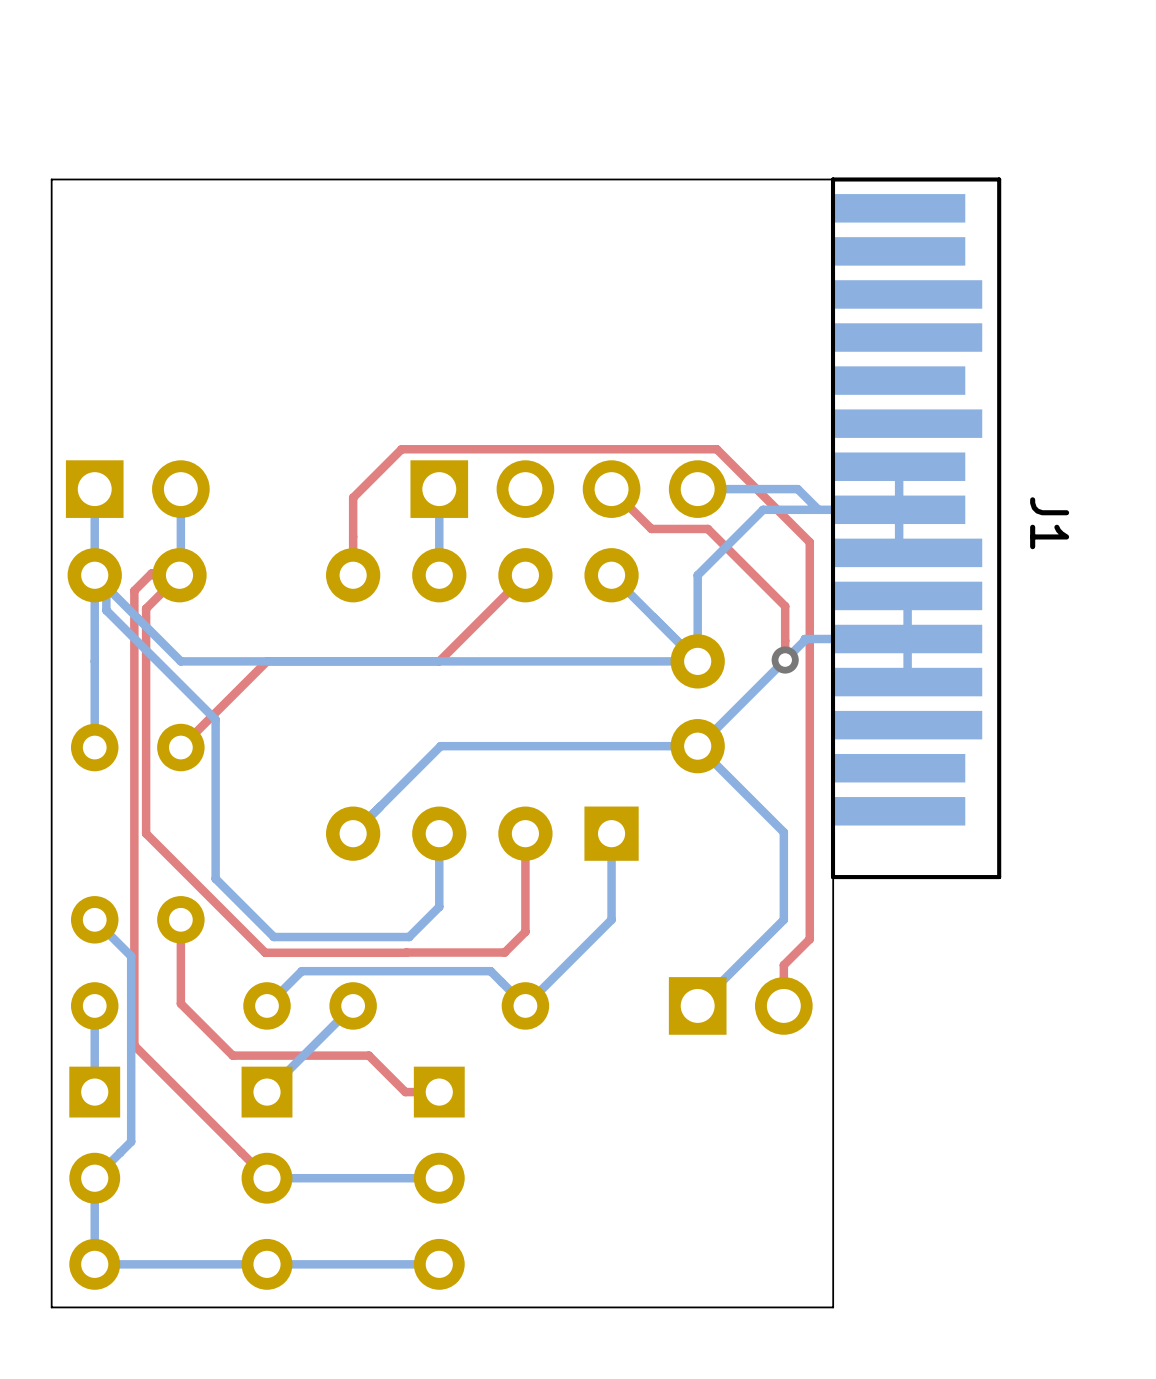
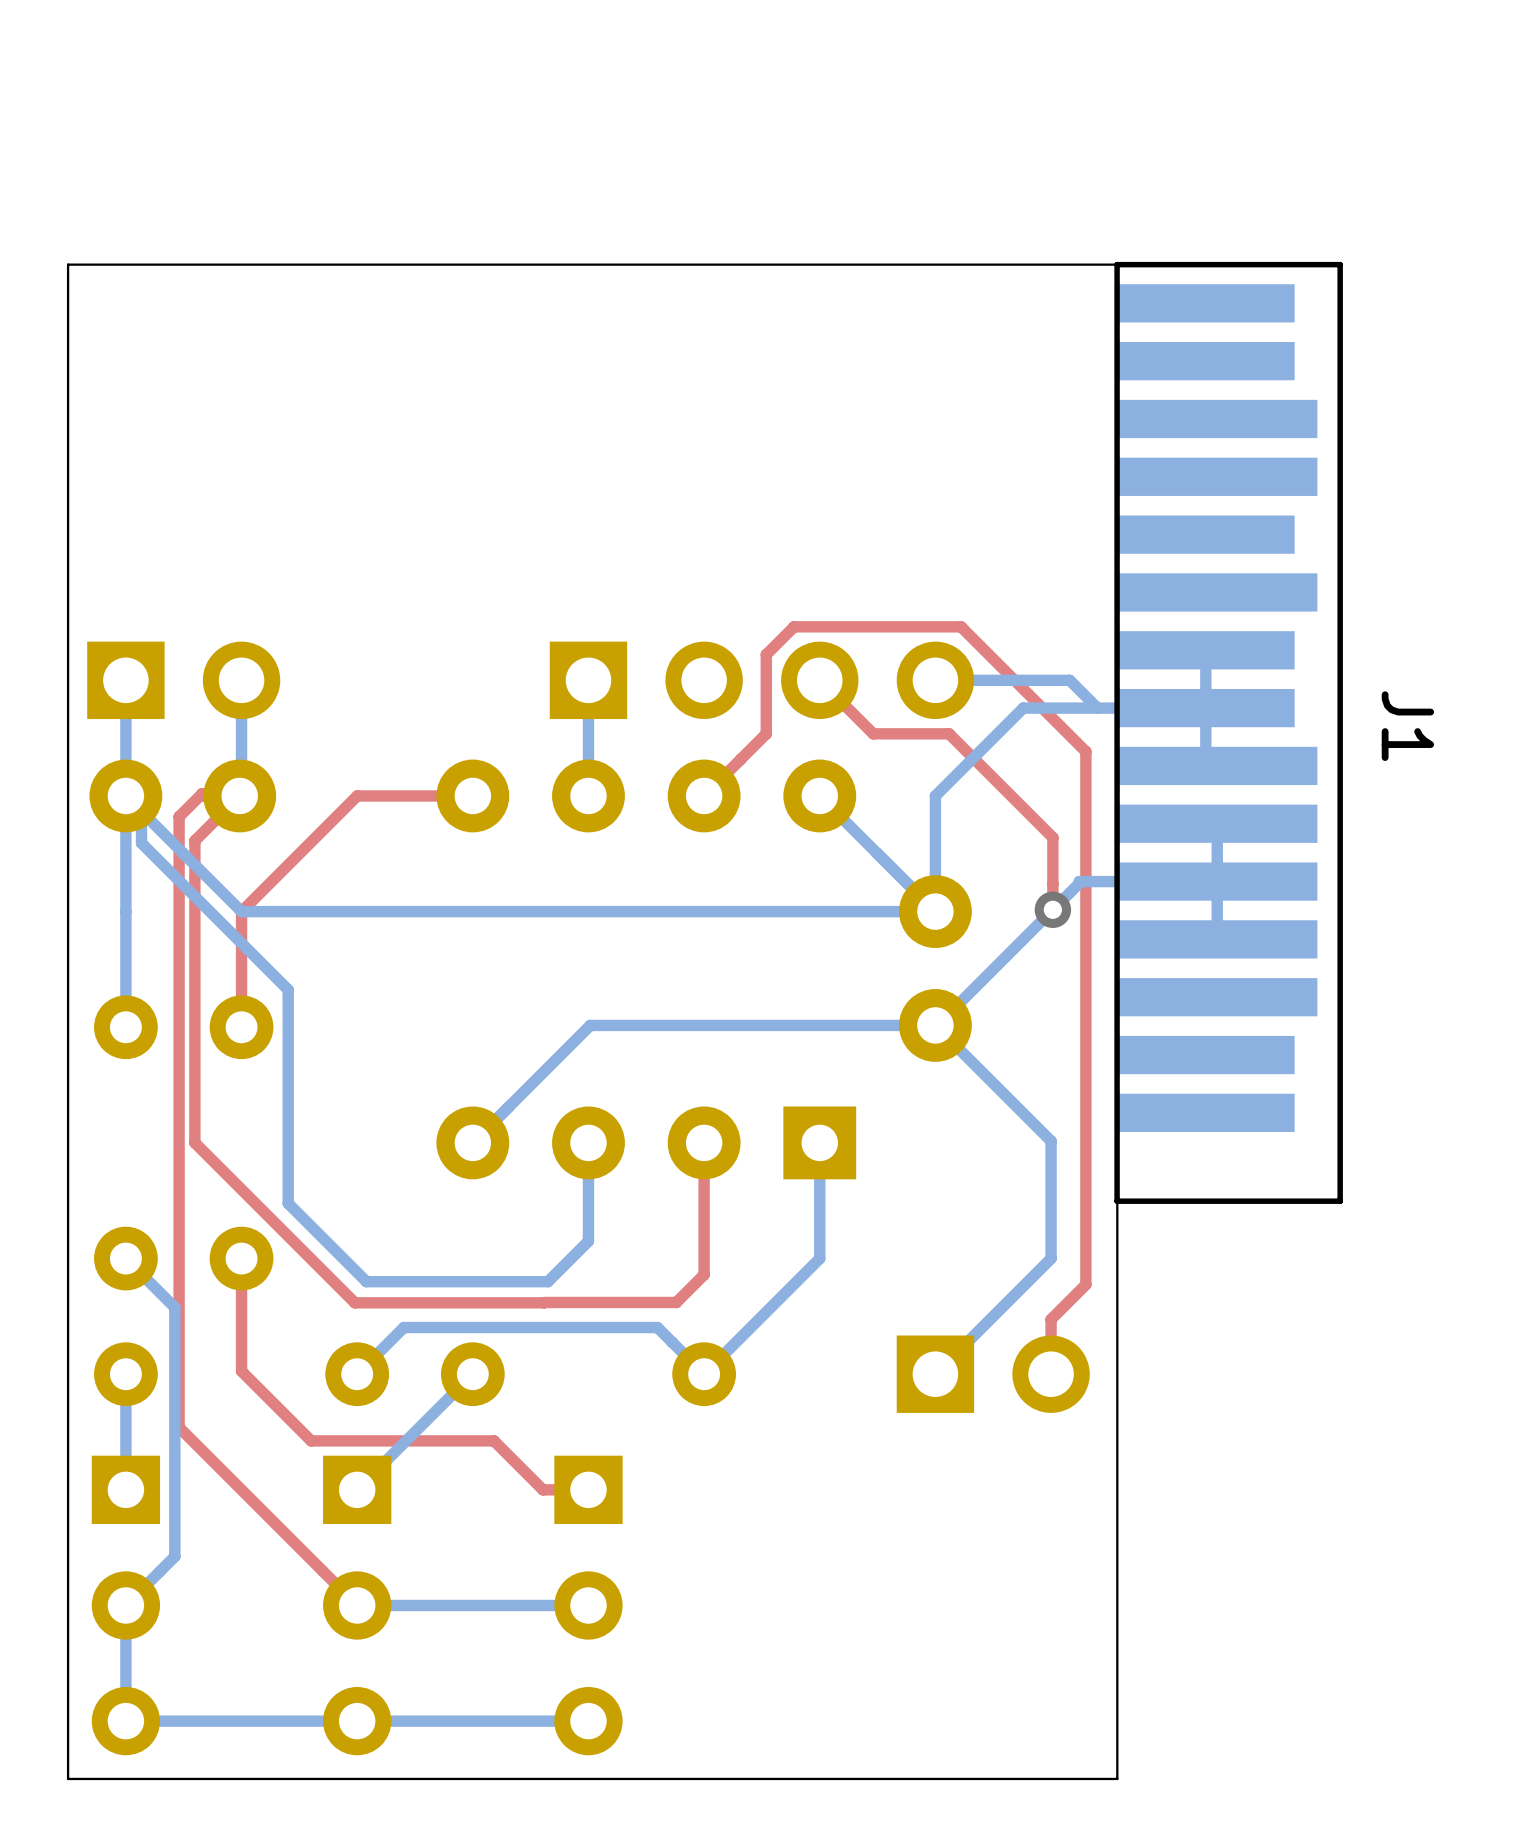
top track: (592, 449) (401, 449) (353, 497) (353, 575) -> (794, 626) (766, 654) (766, 733) (704, 795)
top track: (525, 575) (439, 661) (267, 661) (180, 747) -> (472, 795) (357, 795) (241, 911) (241, 1027)

